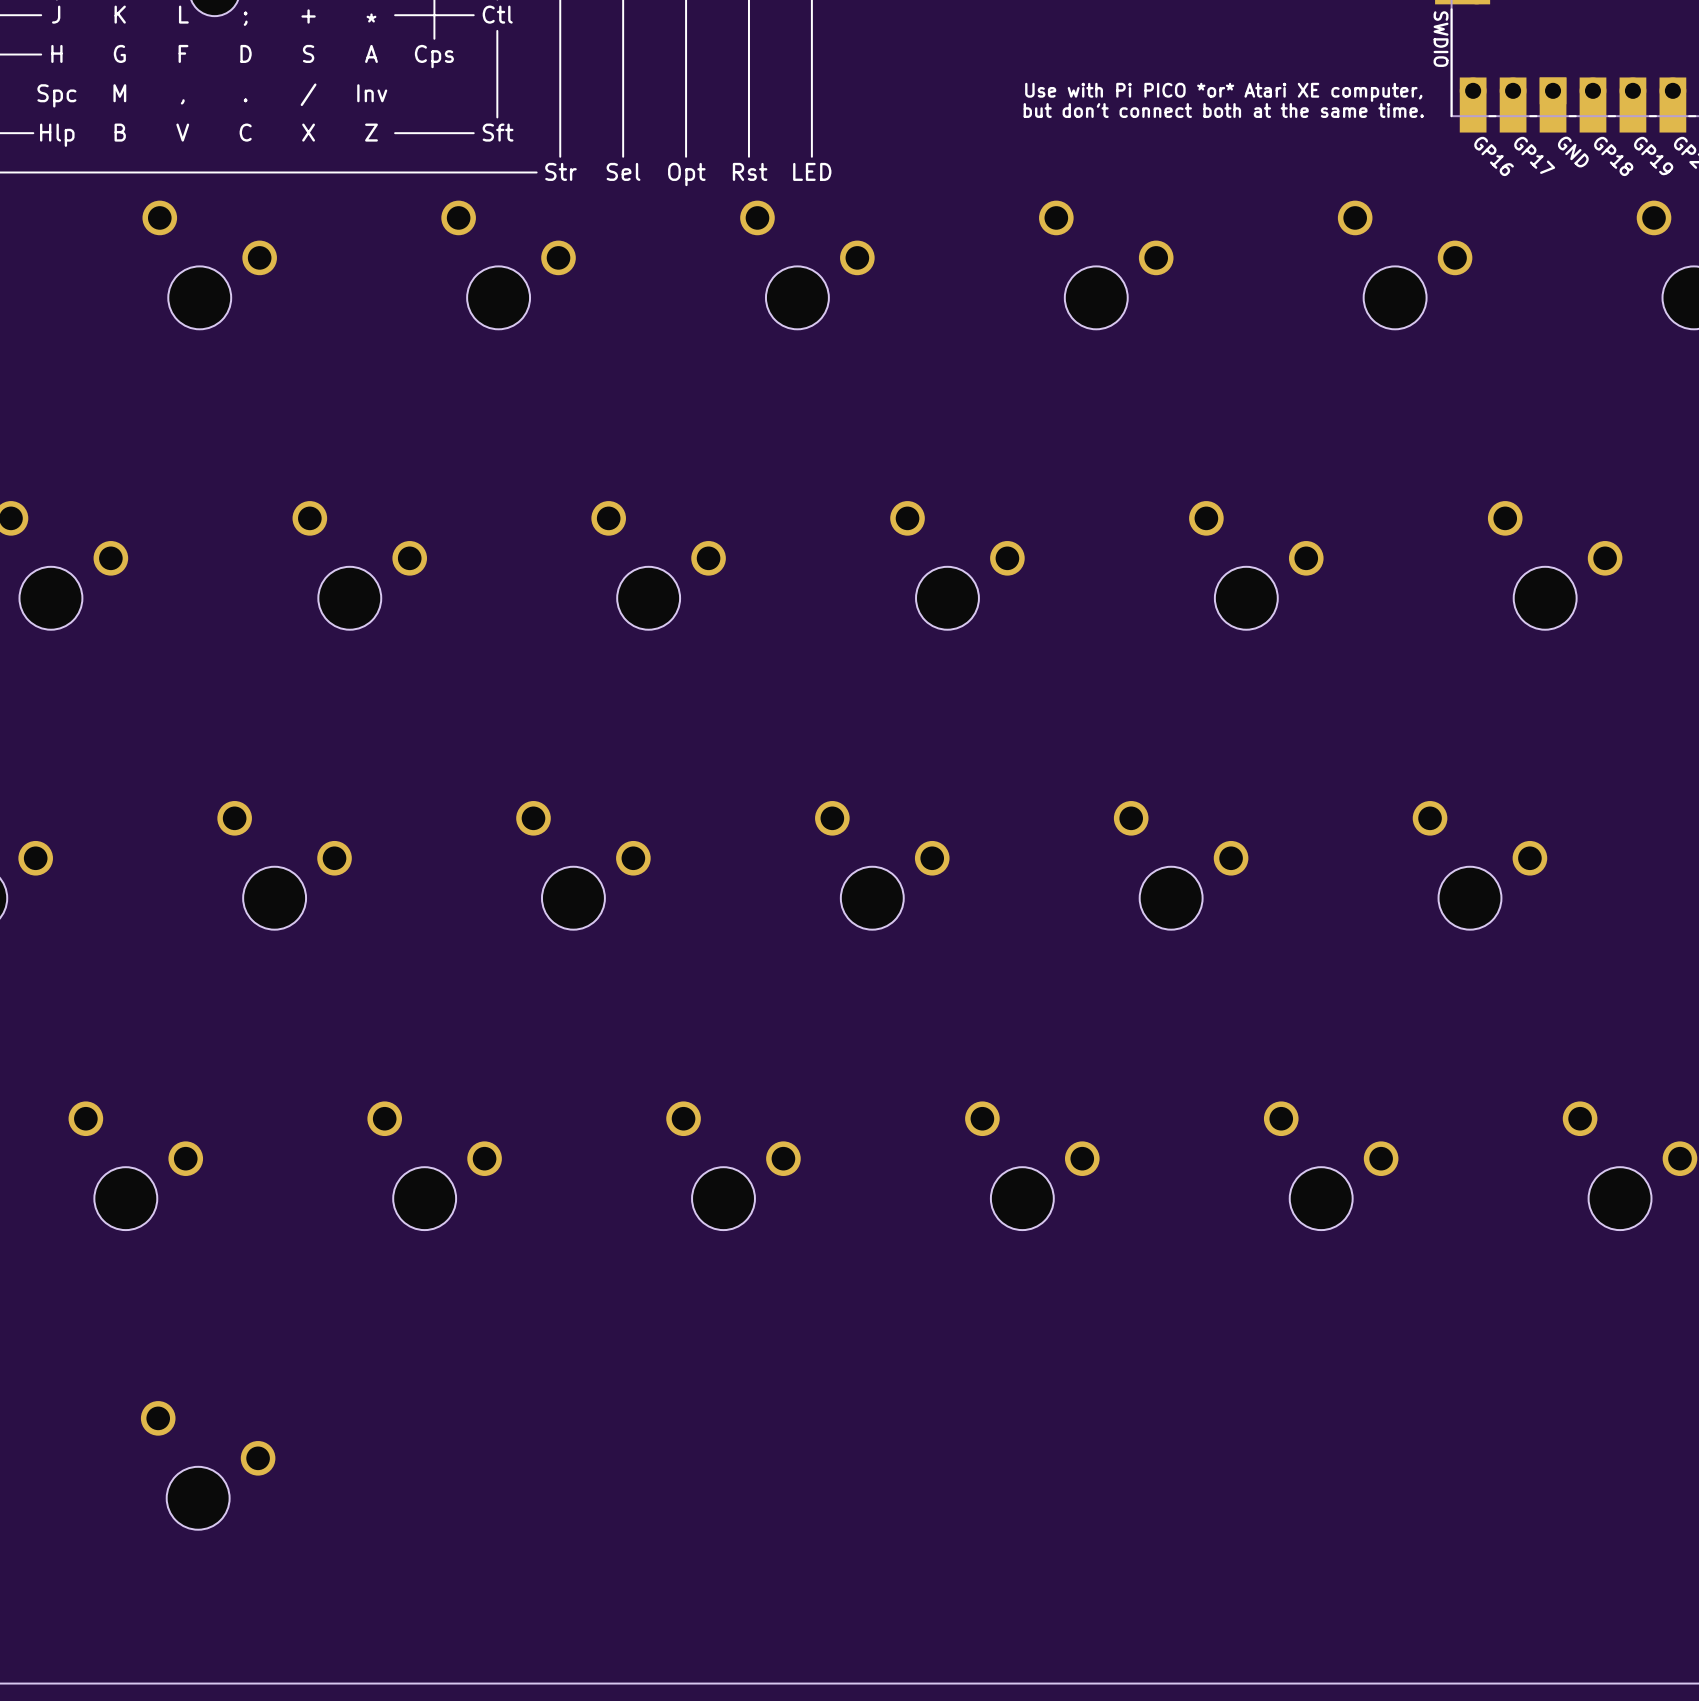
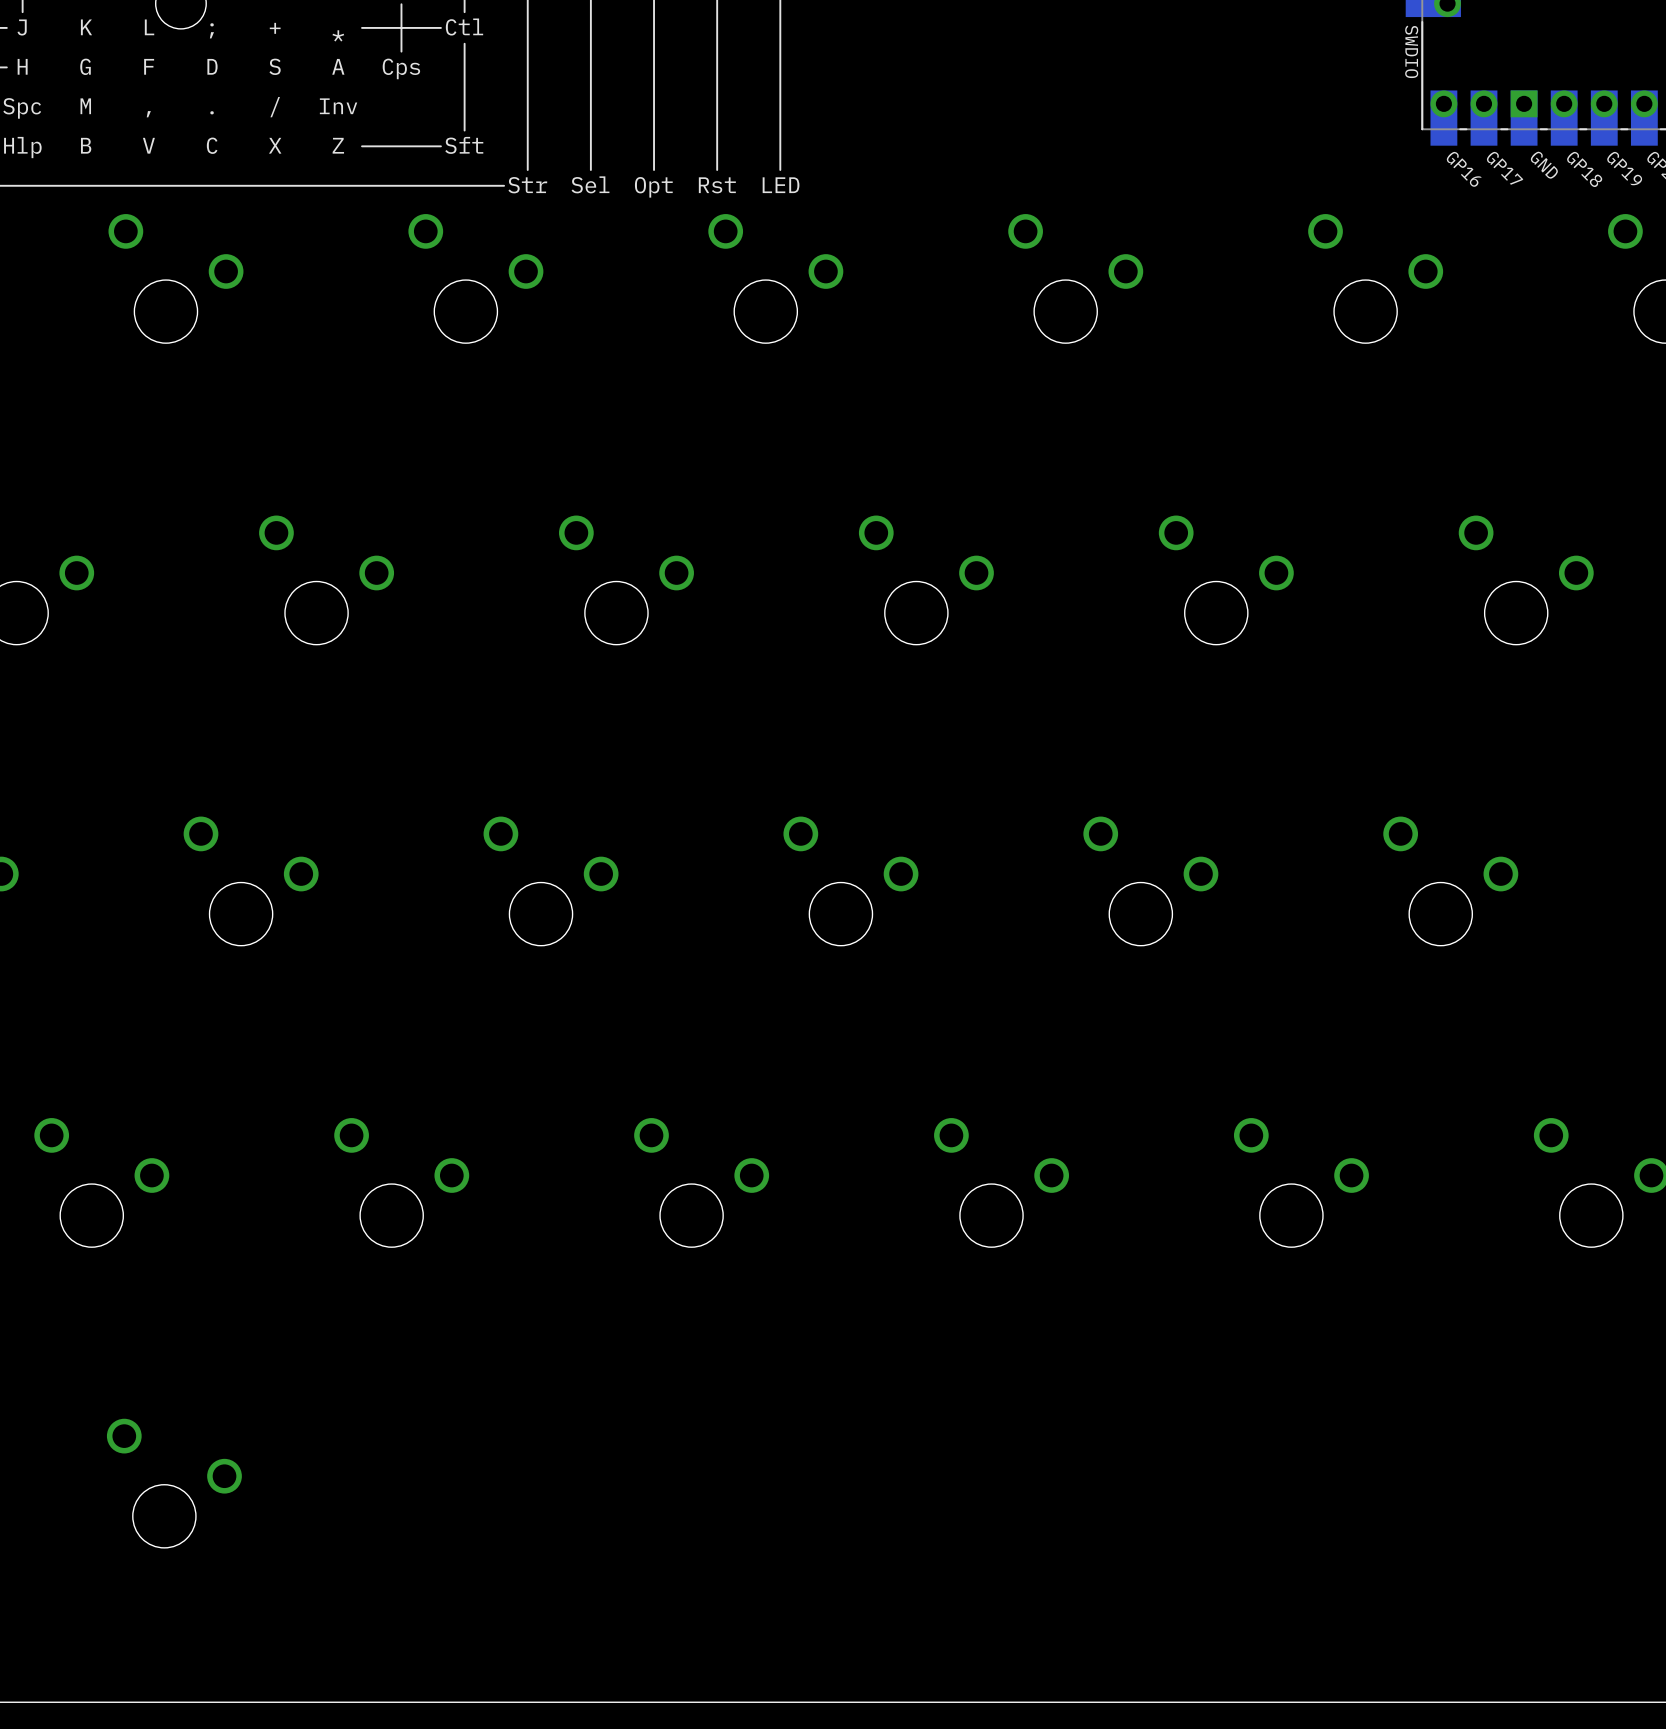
text: Use with Pi PICO *or* Atari XE computer, (1223, 92) -> none
text: but don't connect both at the same time. (1223, 110) -> none

